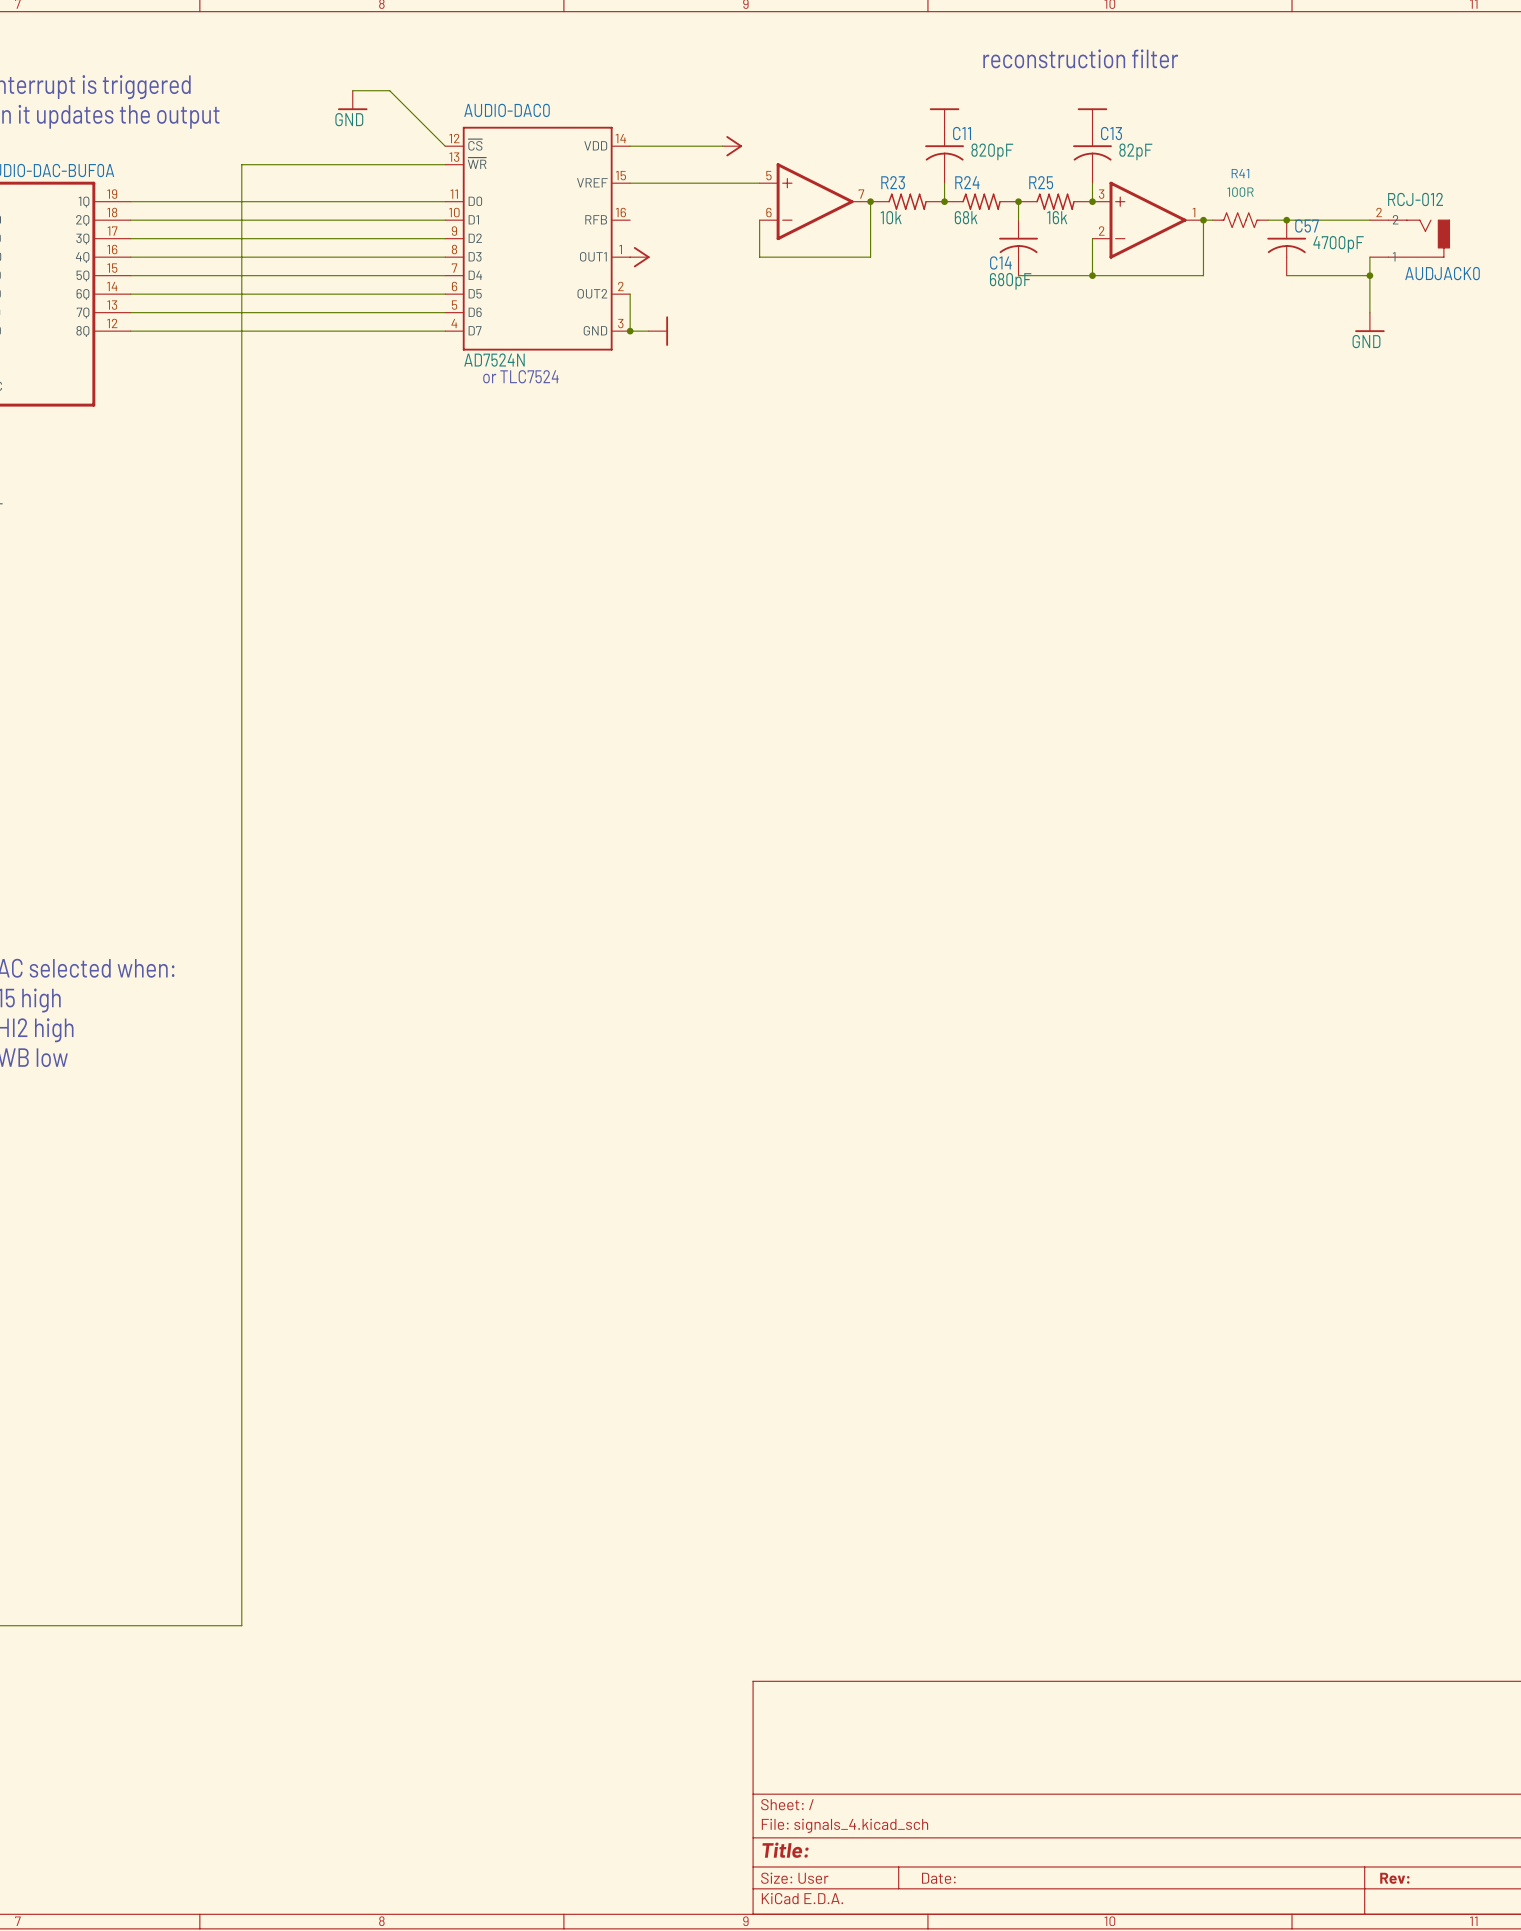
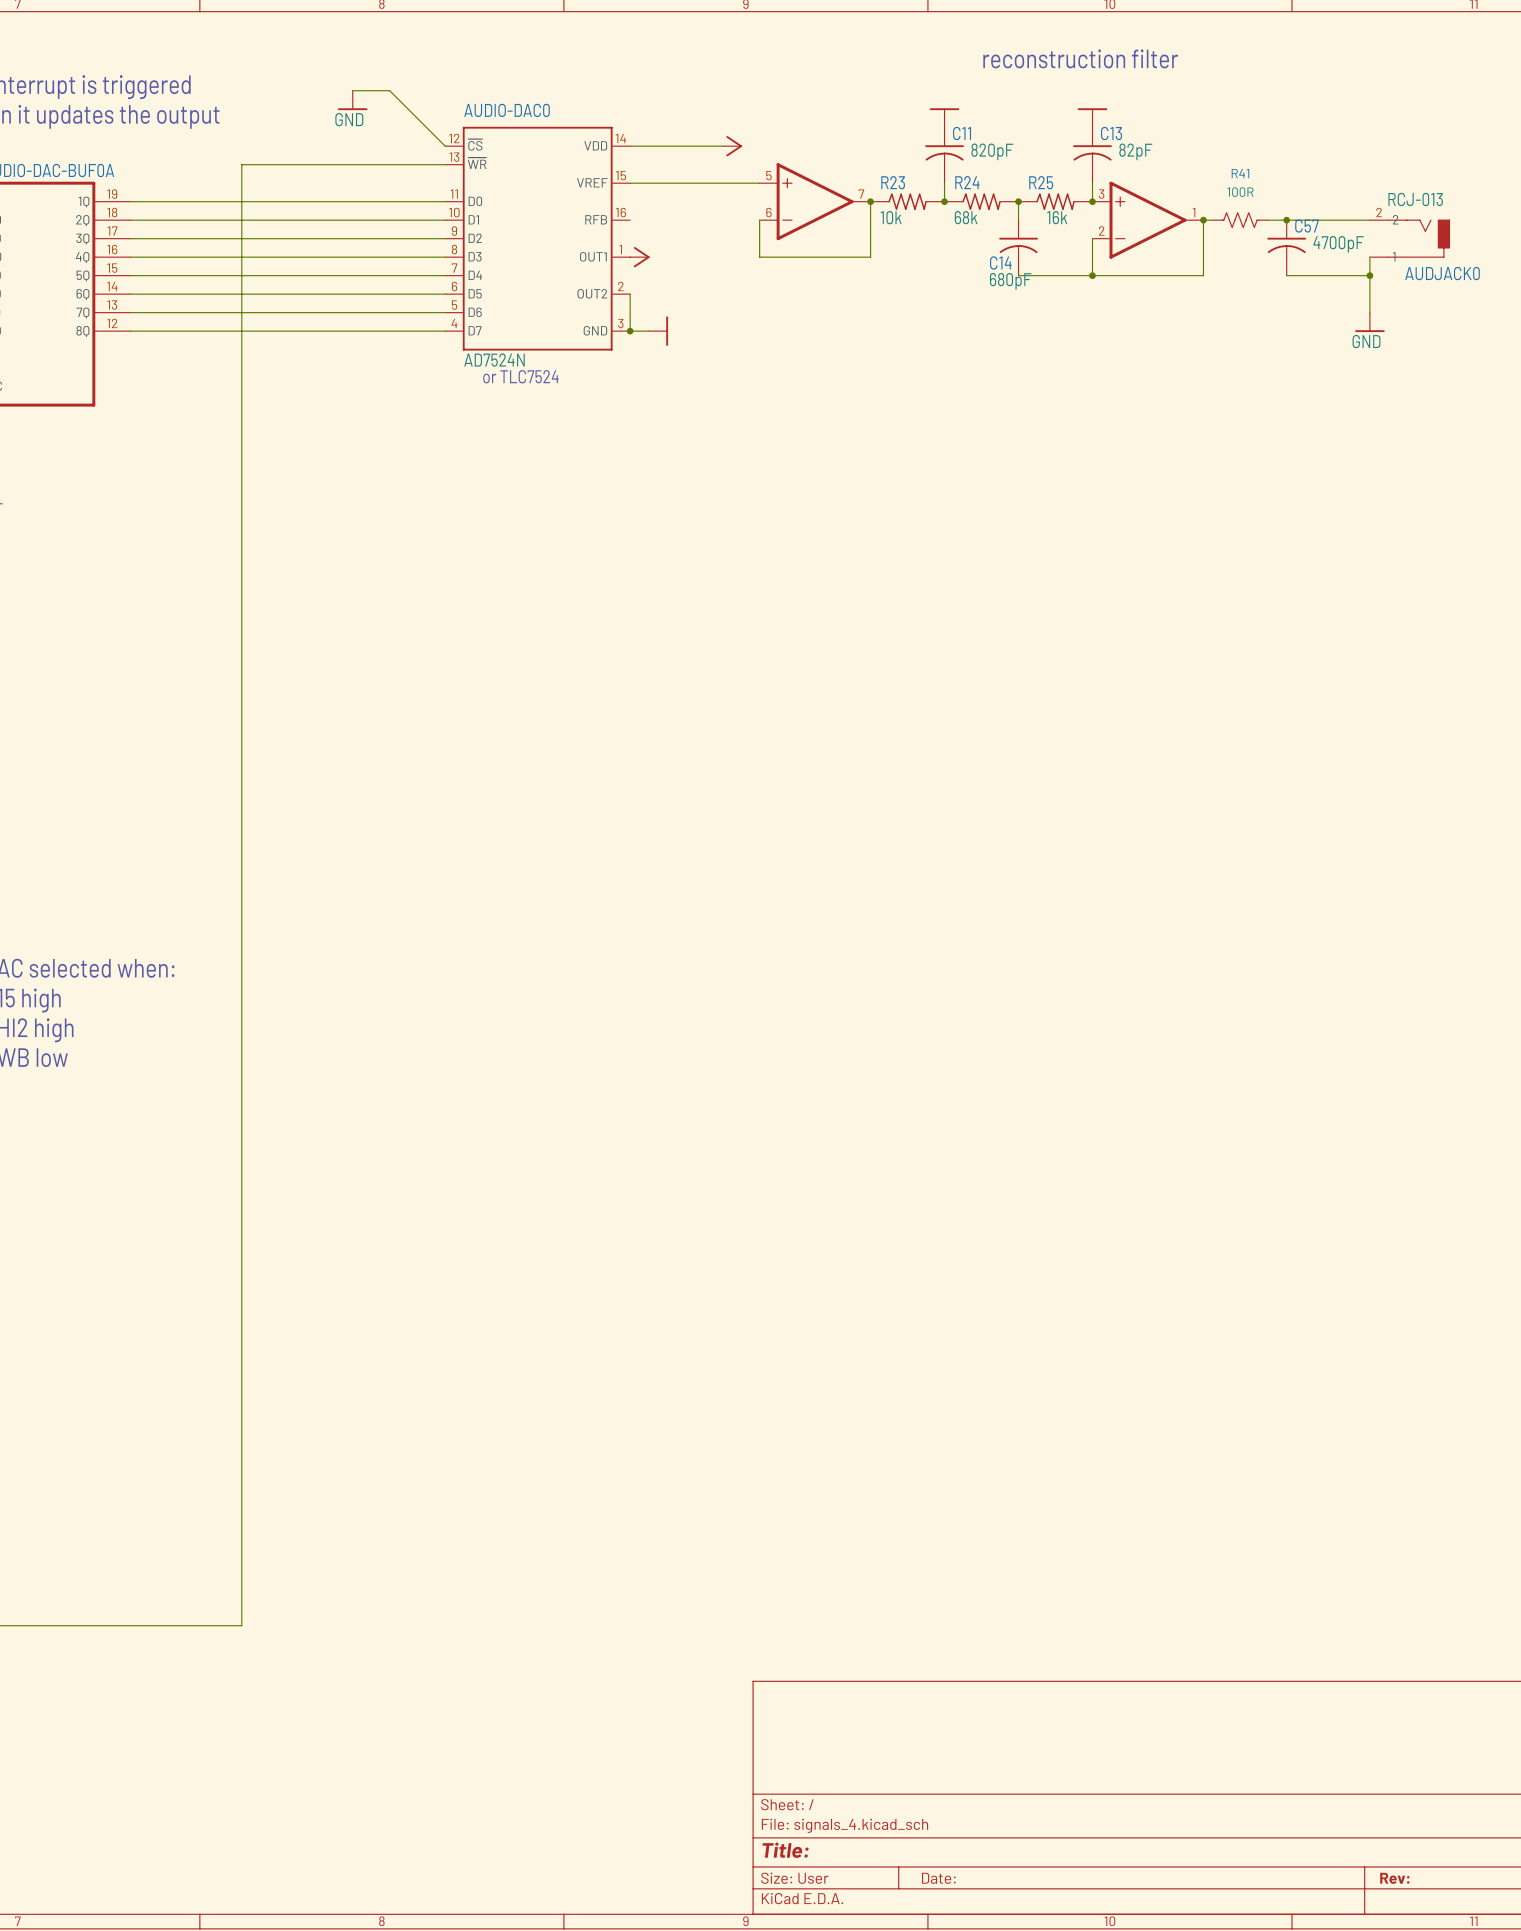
AUDJACK0 value: RCJ-012 (1415, 199) -> RCJ-013 (1415, 199)

